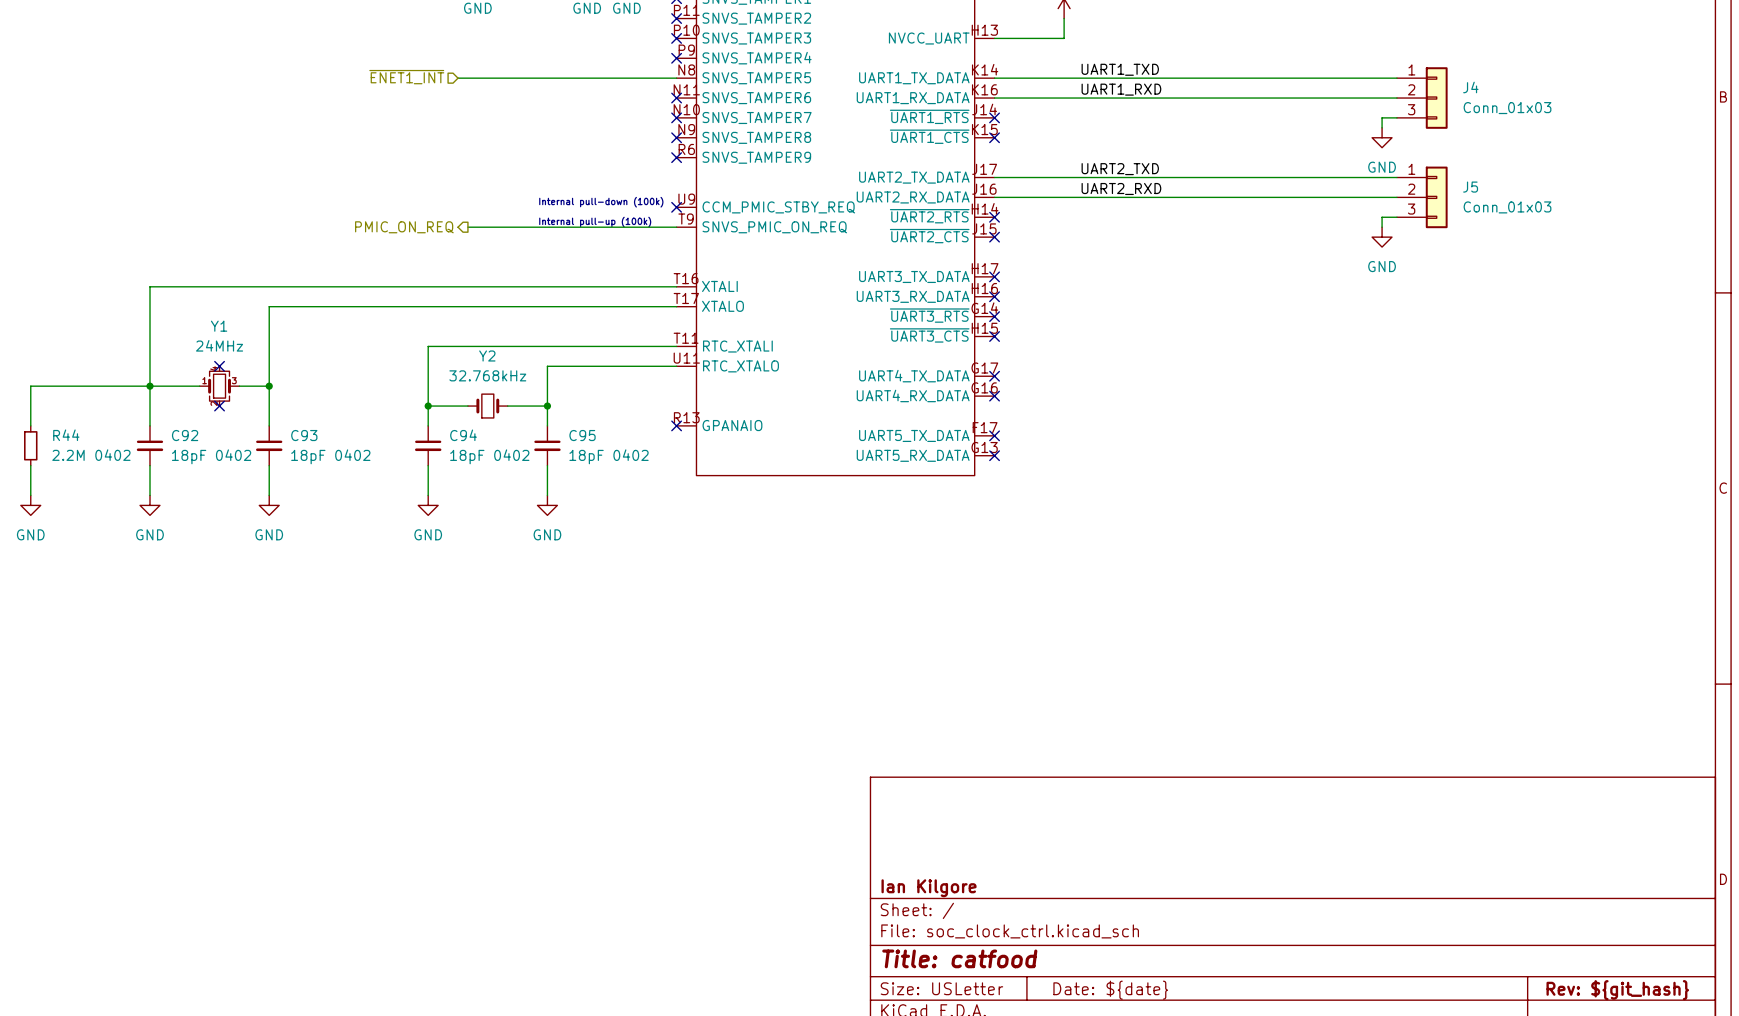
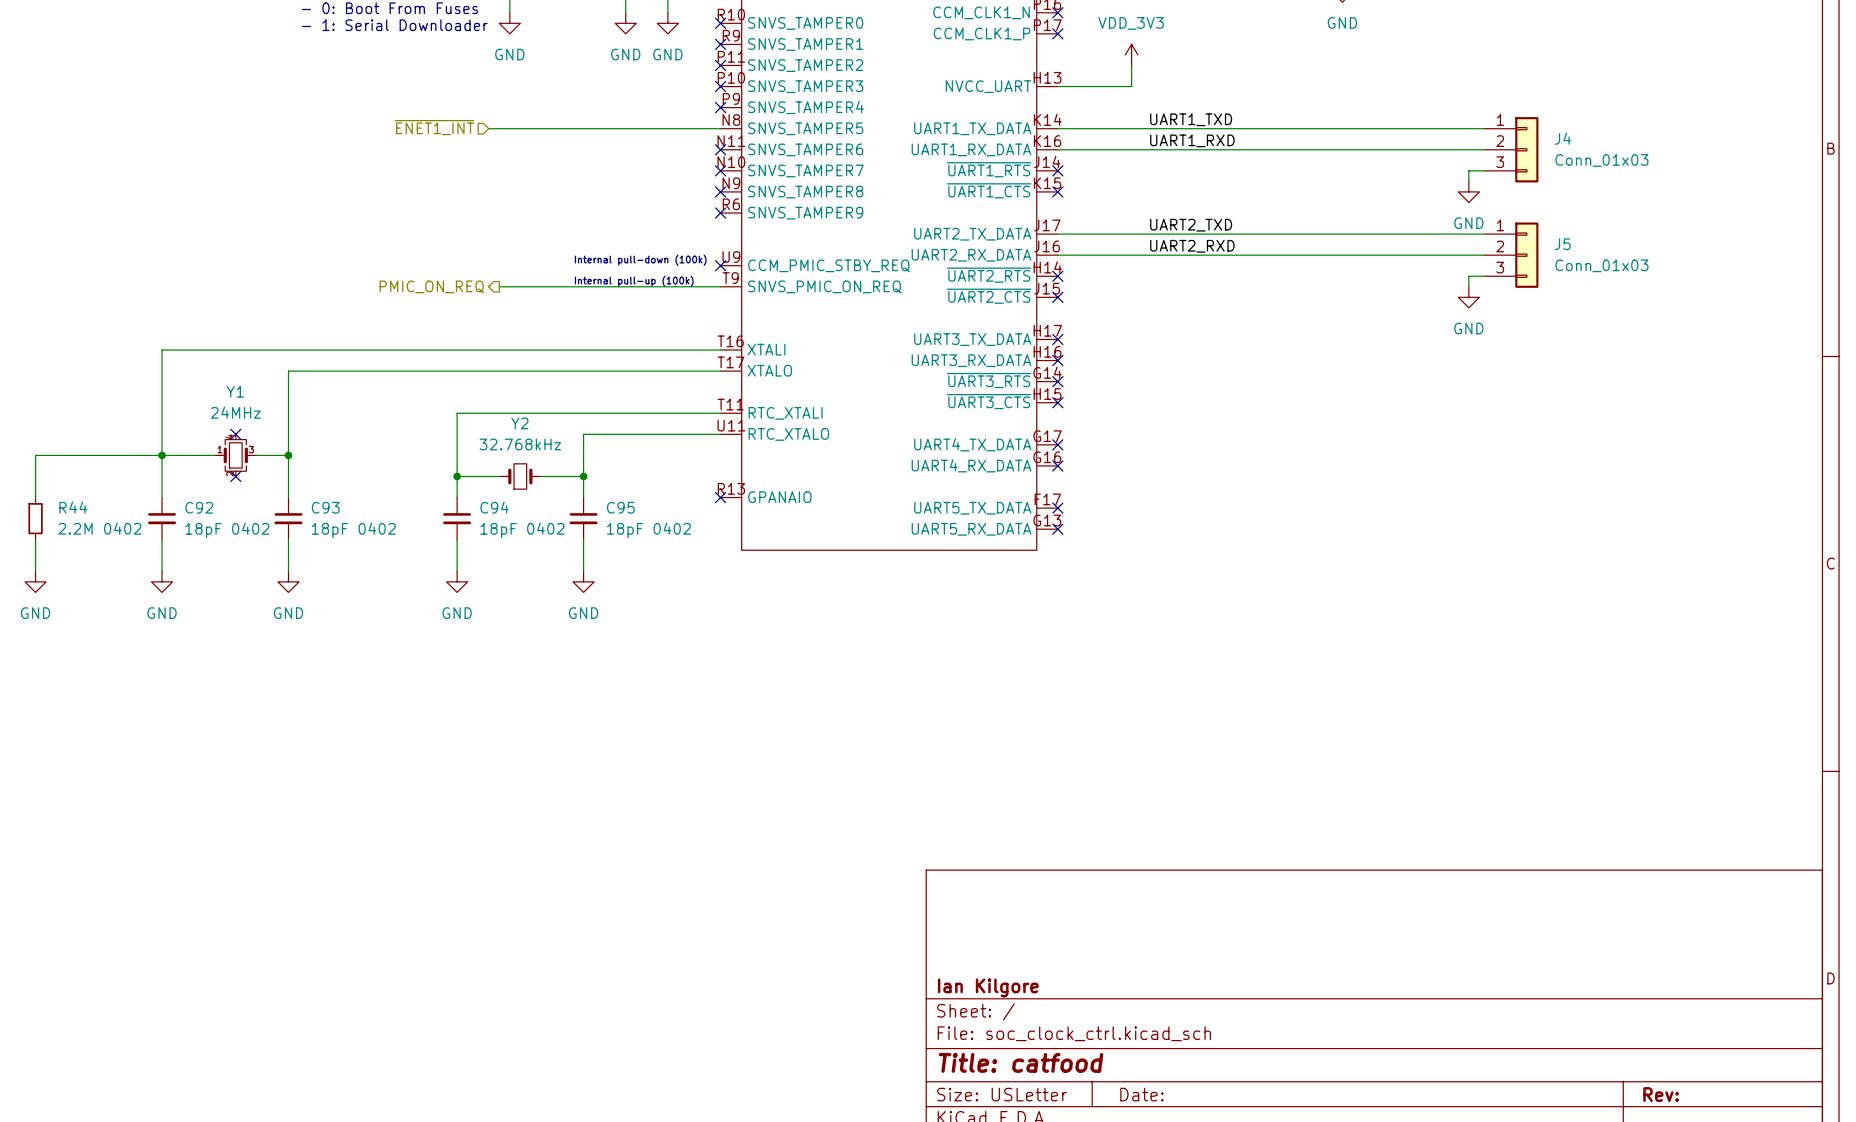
title block: Date: ${date} (1110, 990) -> Date: (1141, 1094)
title block: Rev: ${git_hash} (1617, 990) -> Rev: (1661, 1094)

